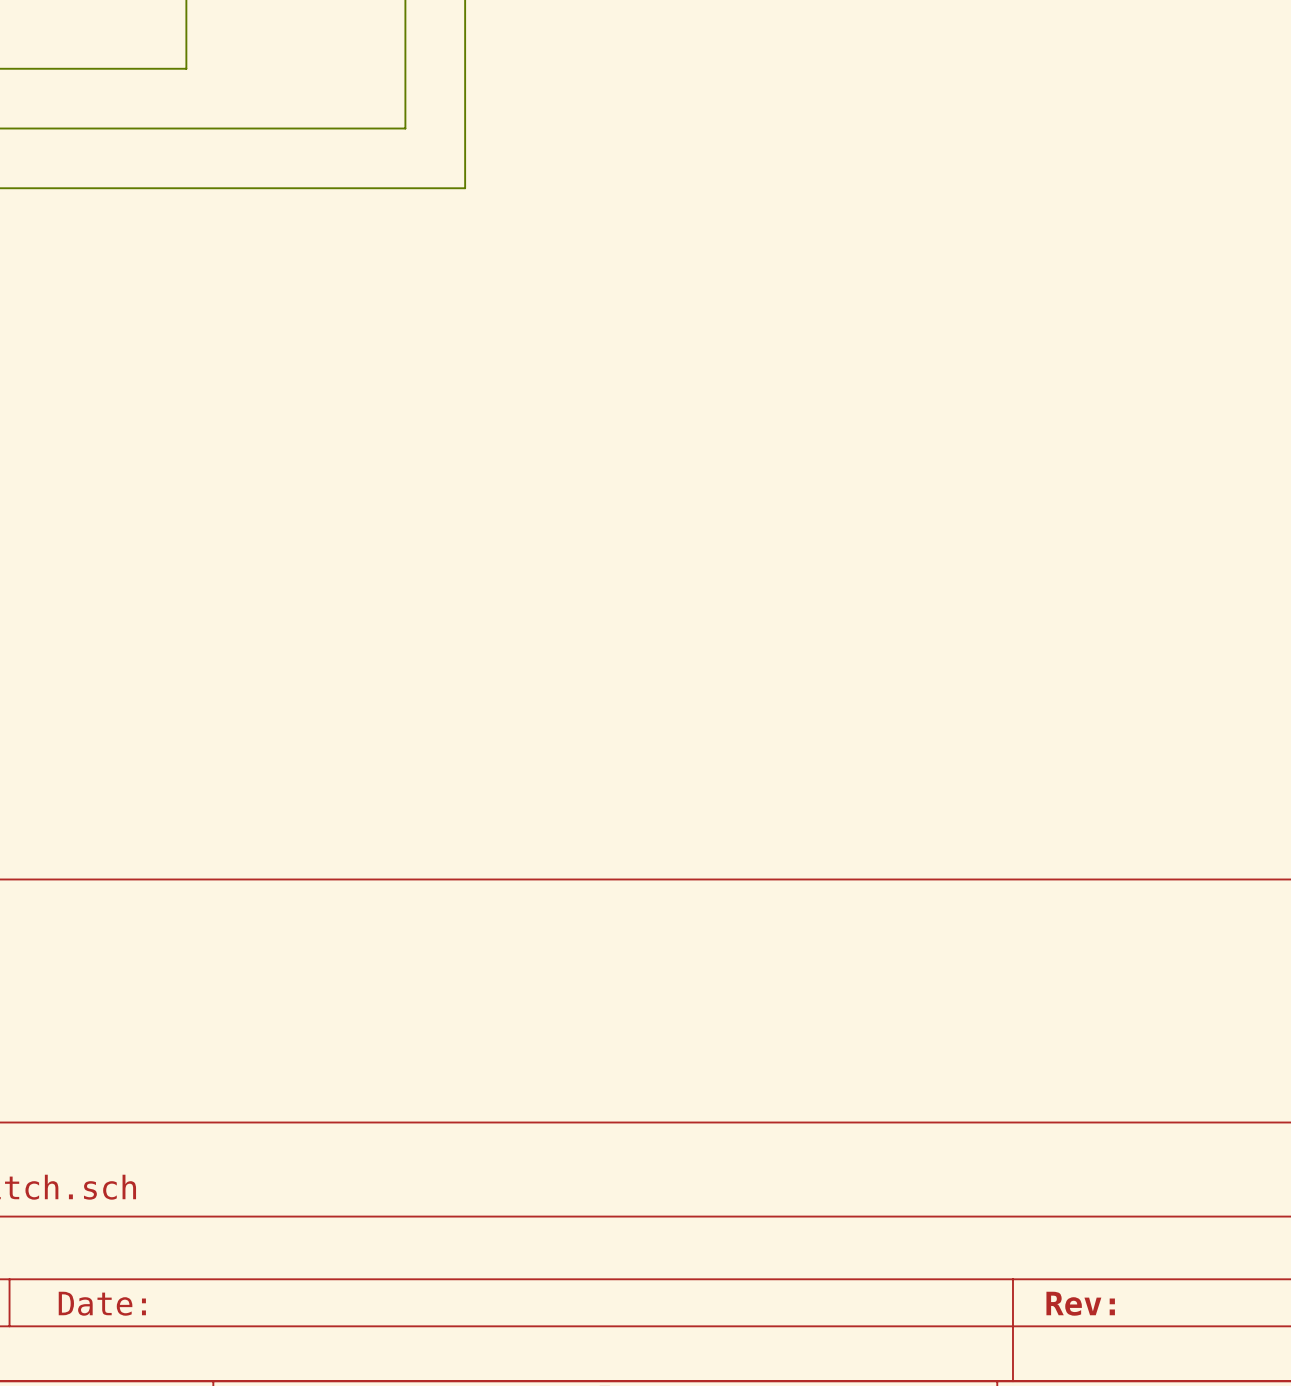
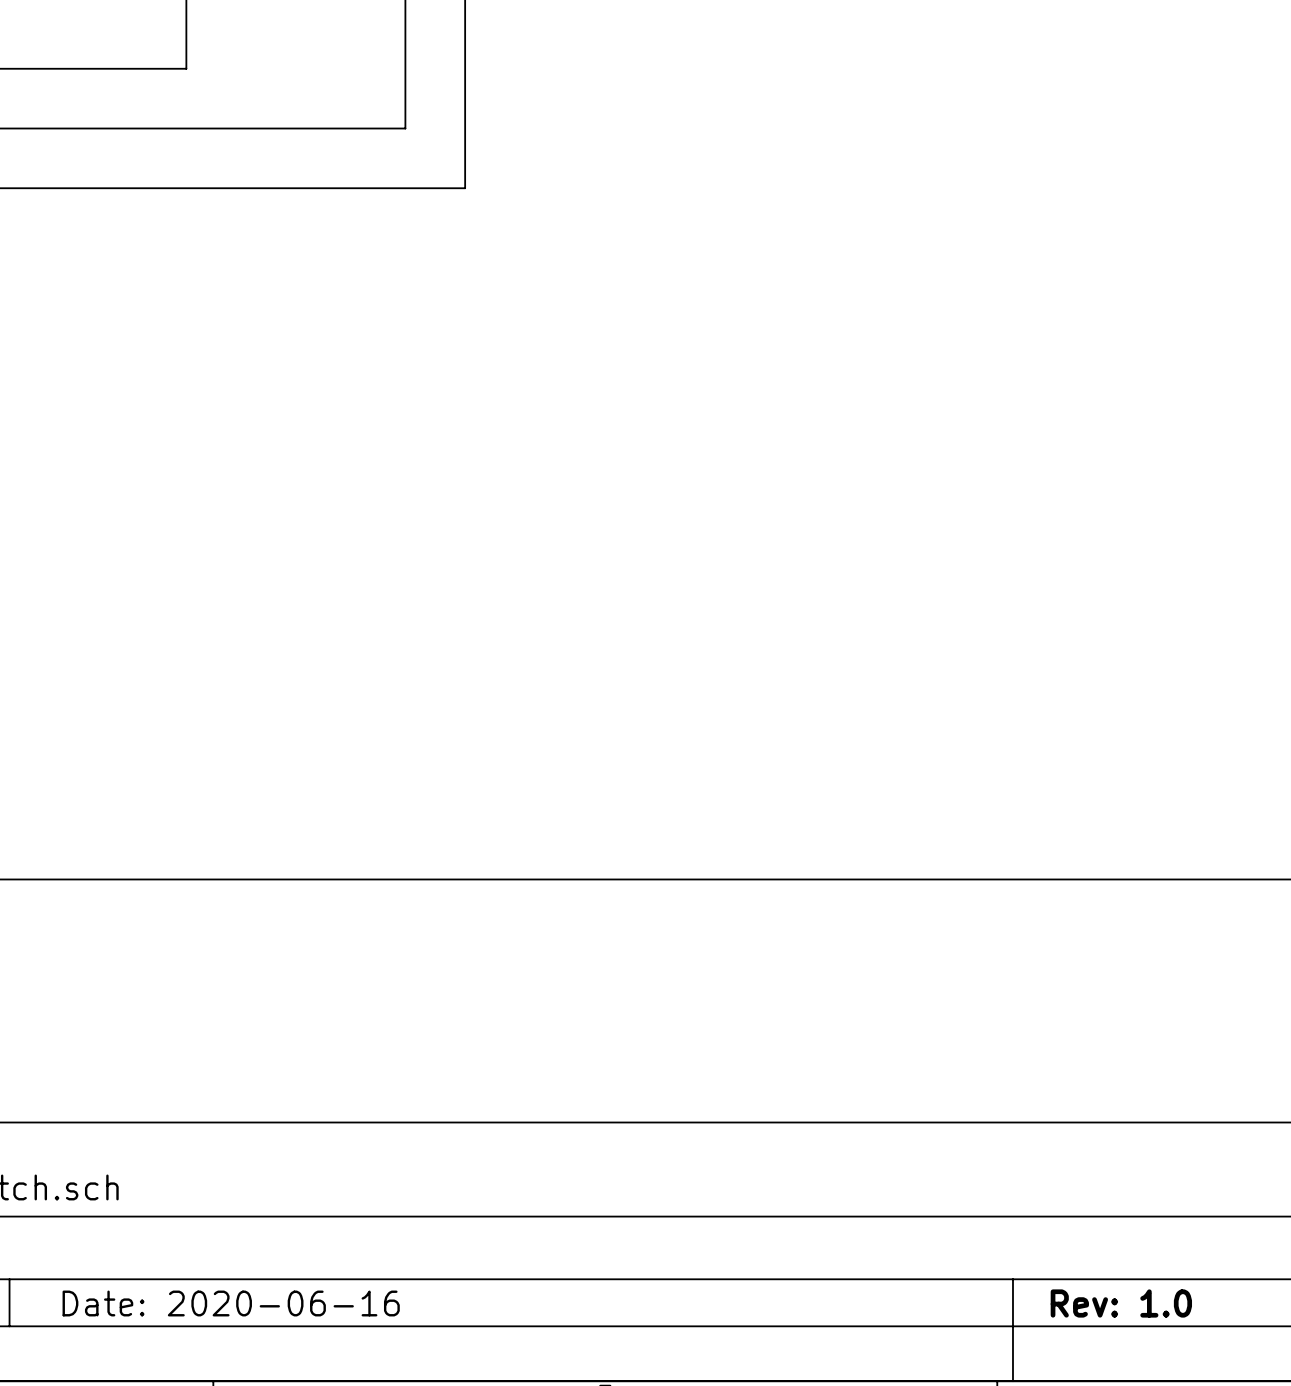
title block: Date: (102, 1303) -> Date: 2020-06-16 (231, 1303)
title block: Rev: (1080, 1303) -> Rev: 1.0 (1121, 1303)

